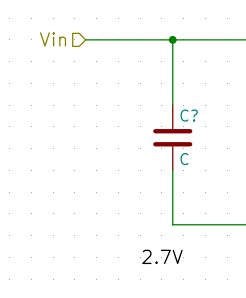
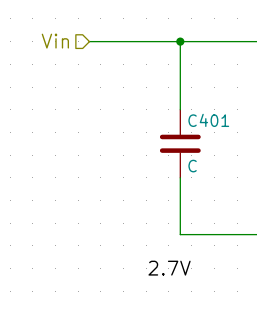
C? name: C? (189, 115) -> C401 (208, 120)

